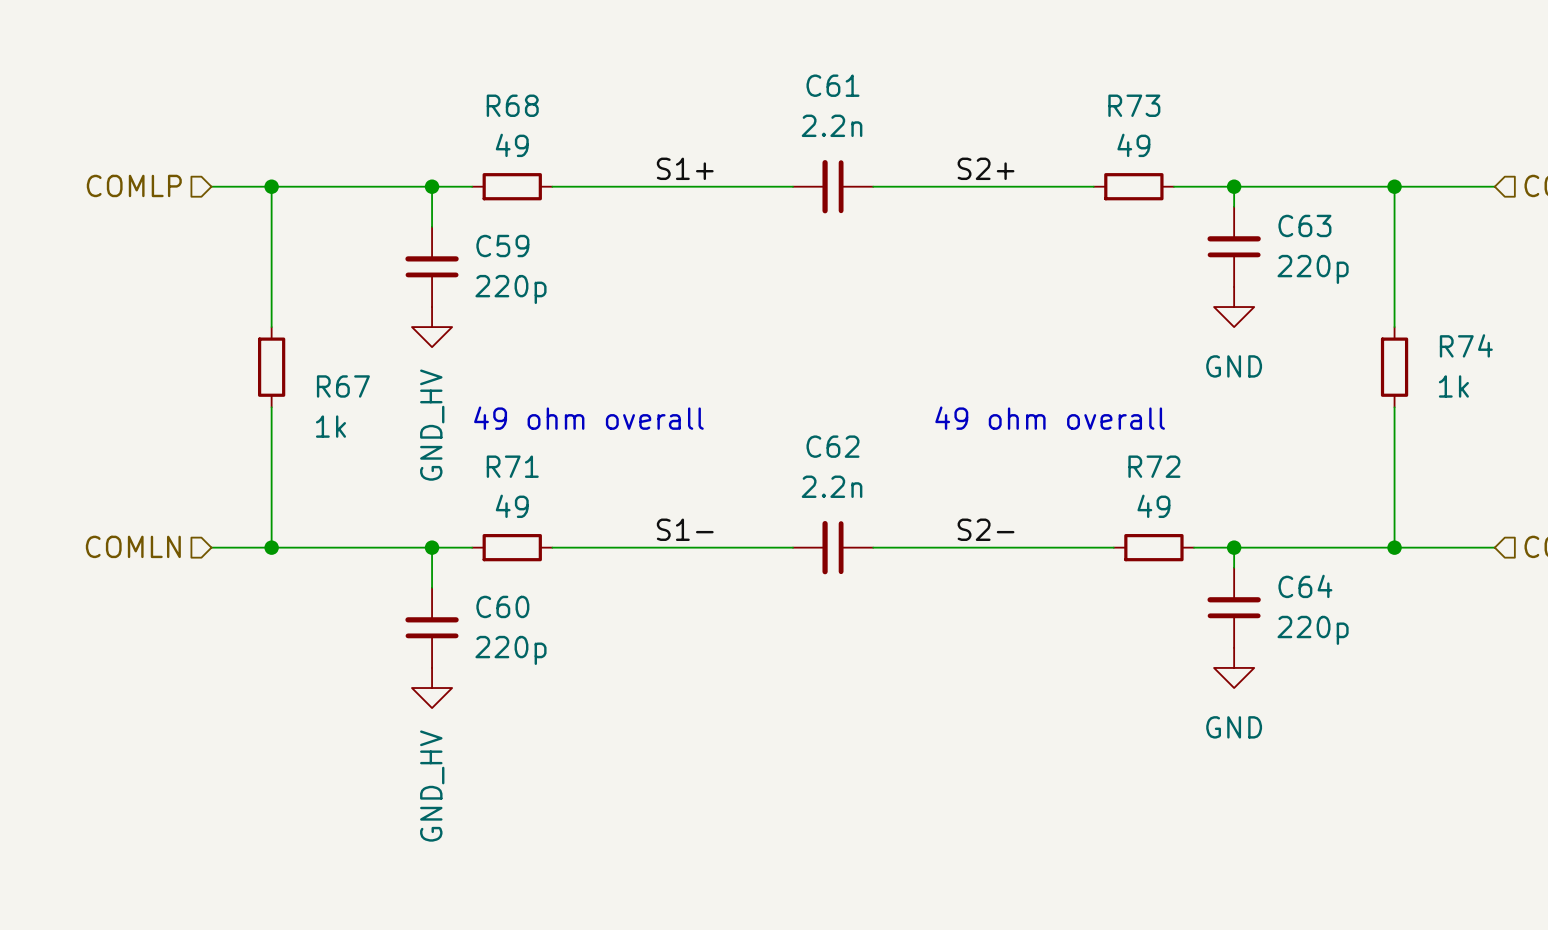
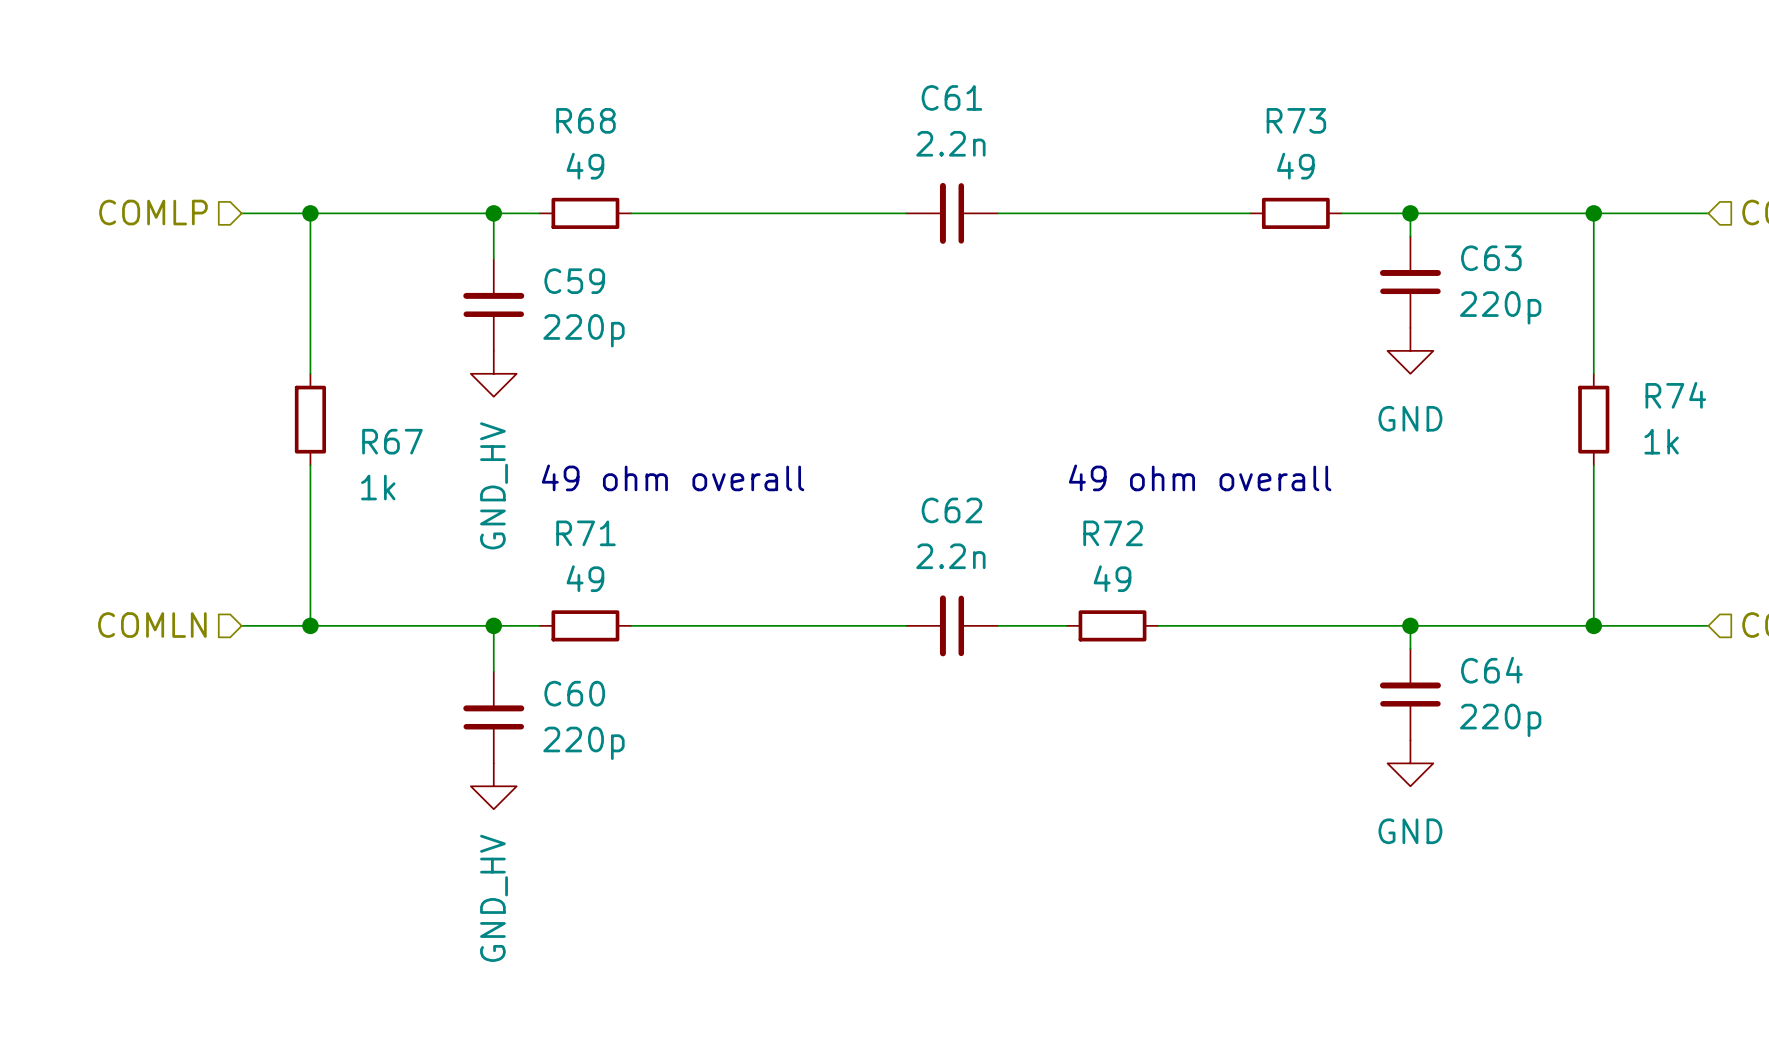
label: S1+ (685, 168) -> none
label: S2+ (986, 168) -> none
label: S1- (685, 529) -> none
label: S2- (986, 529) -> none
wire: (933, 547) (1013, 547) -> (1272, 625) (1364, 625)
R72 position: (1153, 547) -> (1112, 625)

